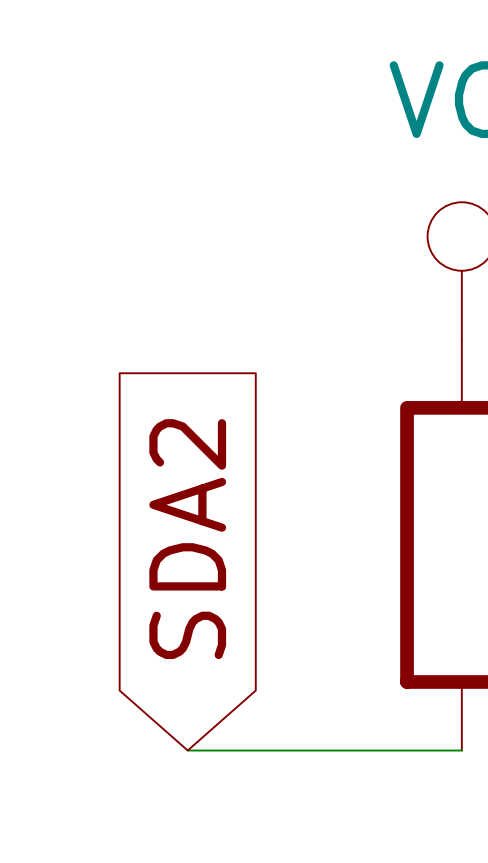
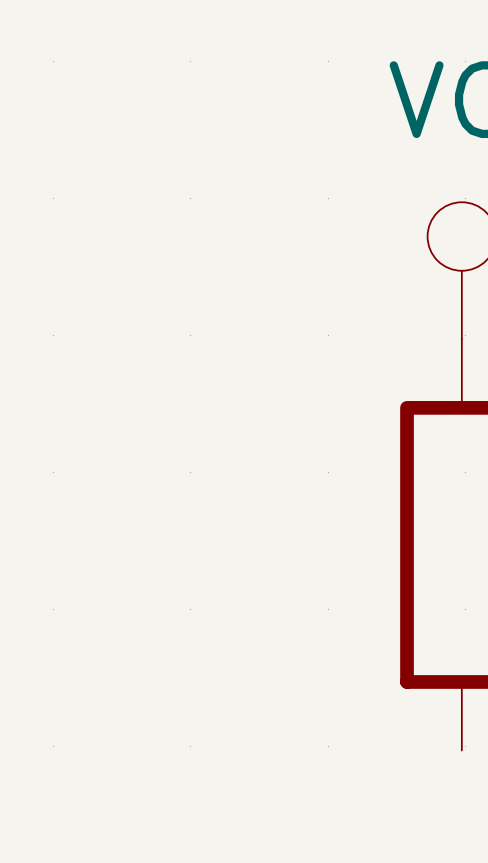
global label: SDA2 (187, 539) -> none
wire: (187, 750) (461, 750) -> none

